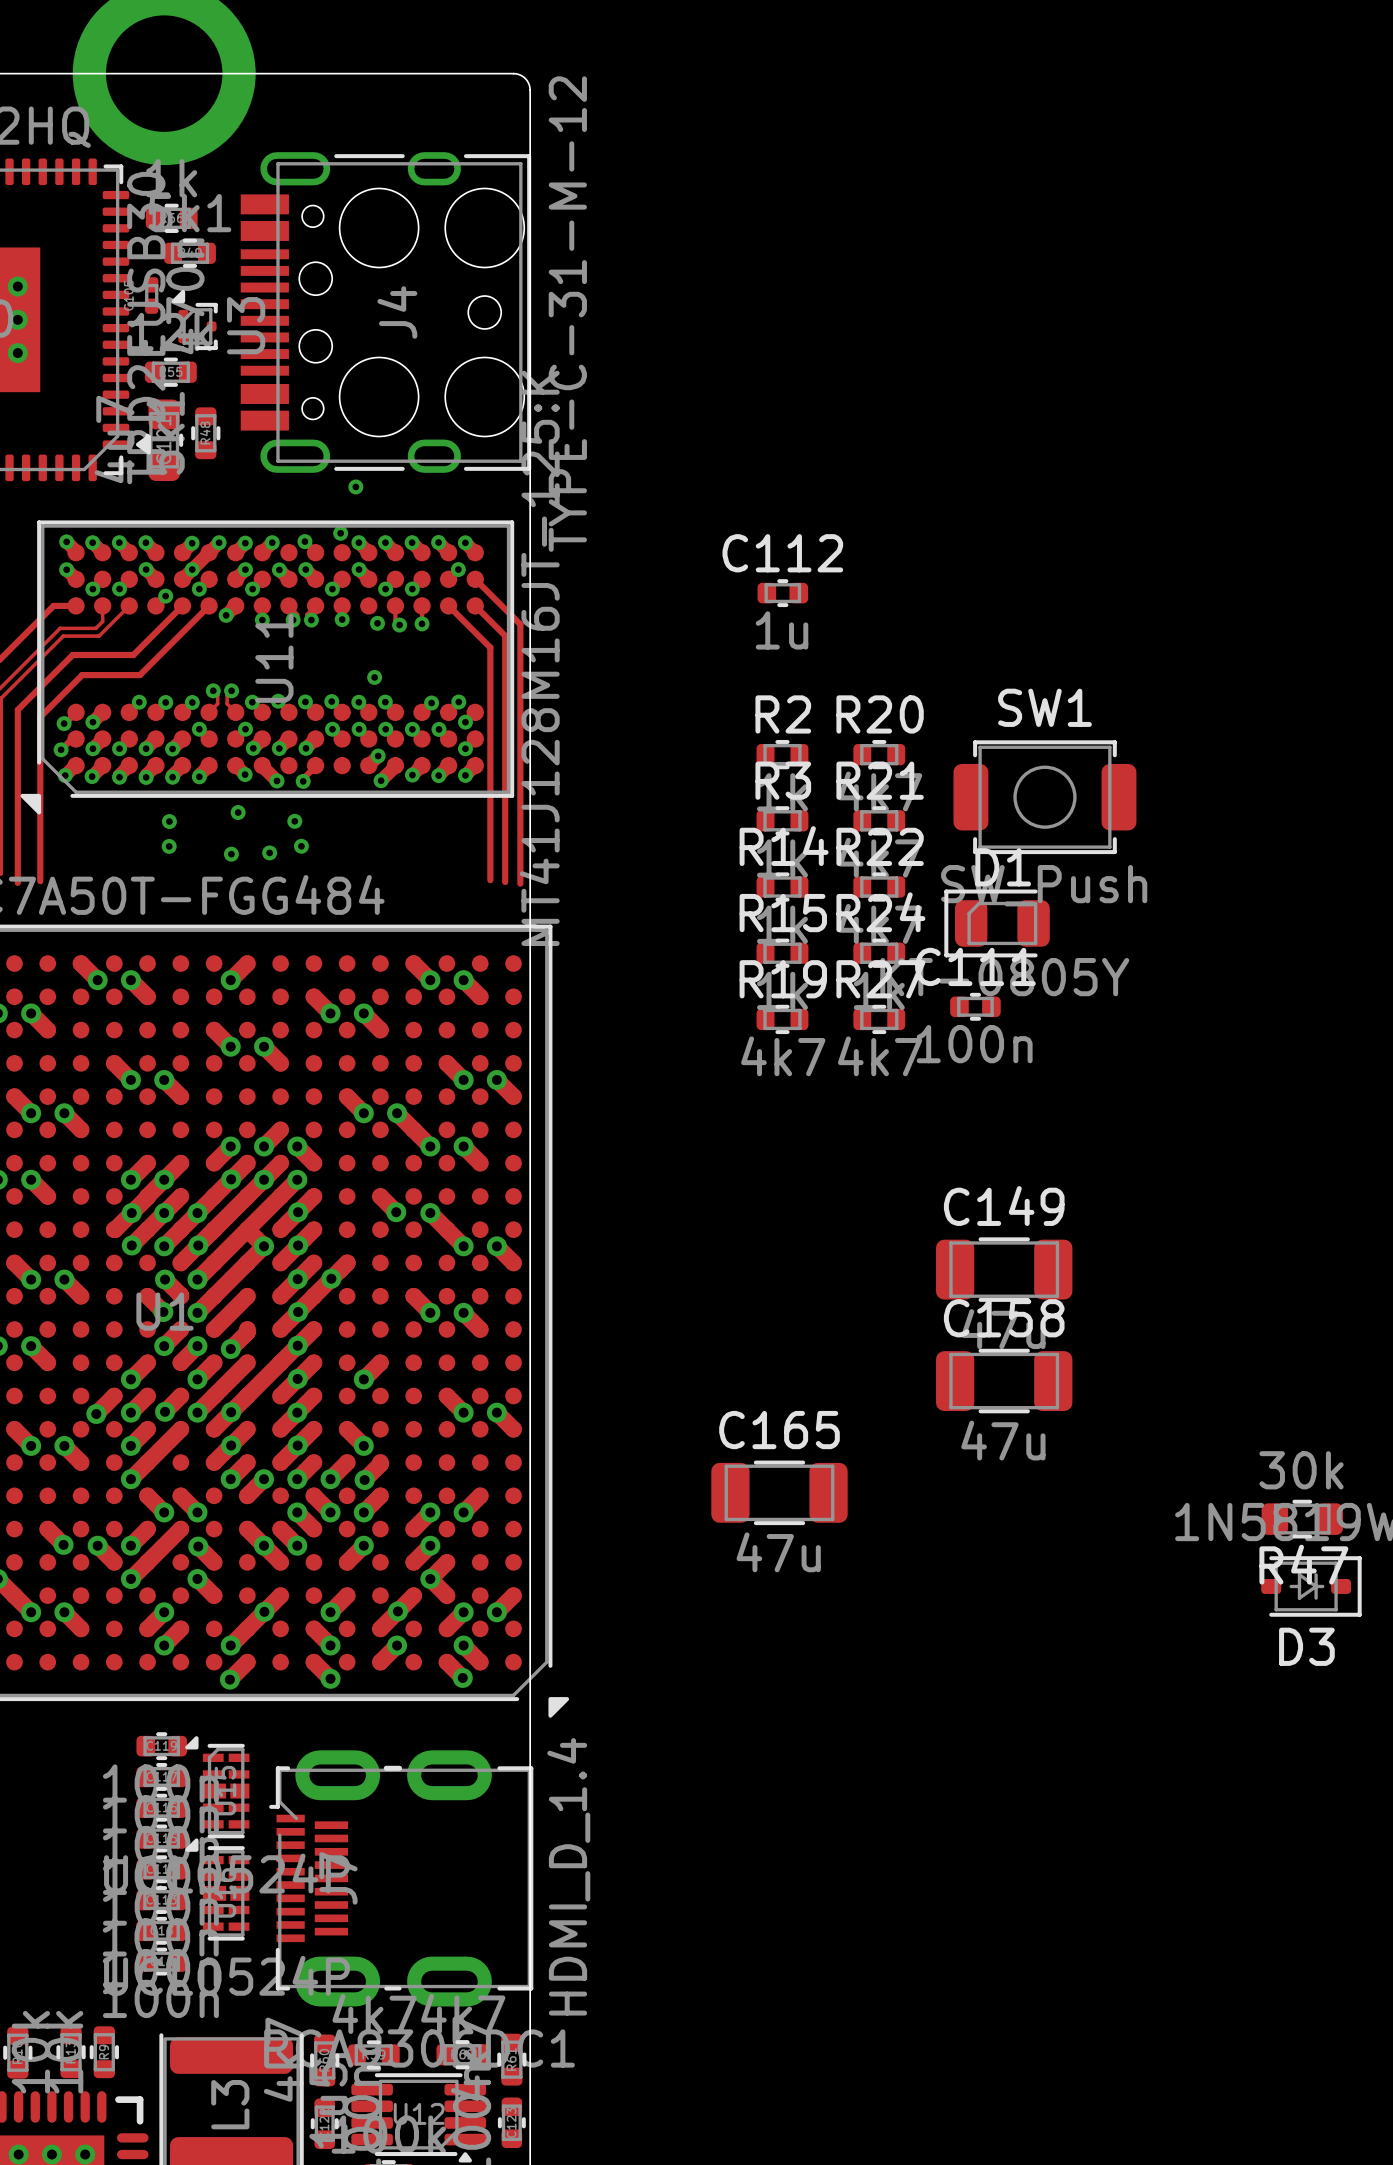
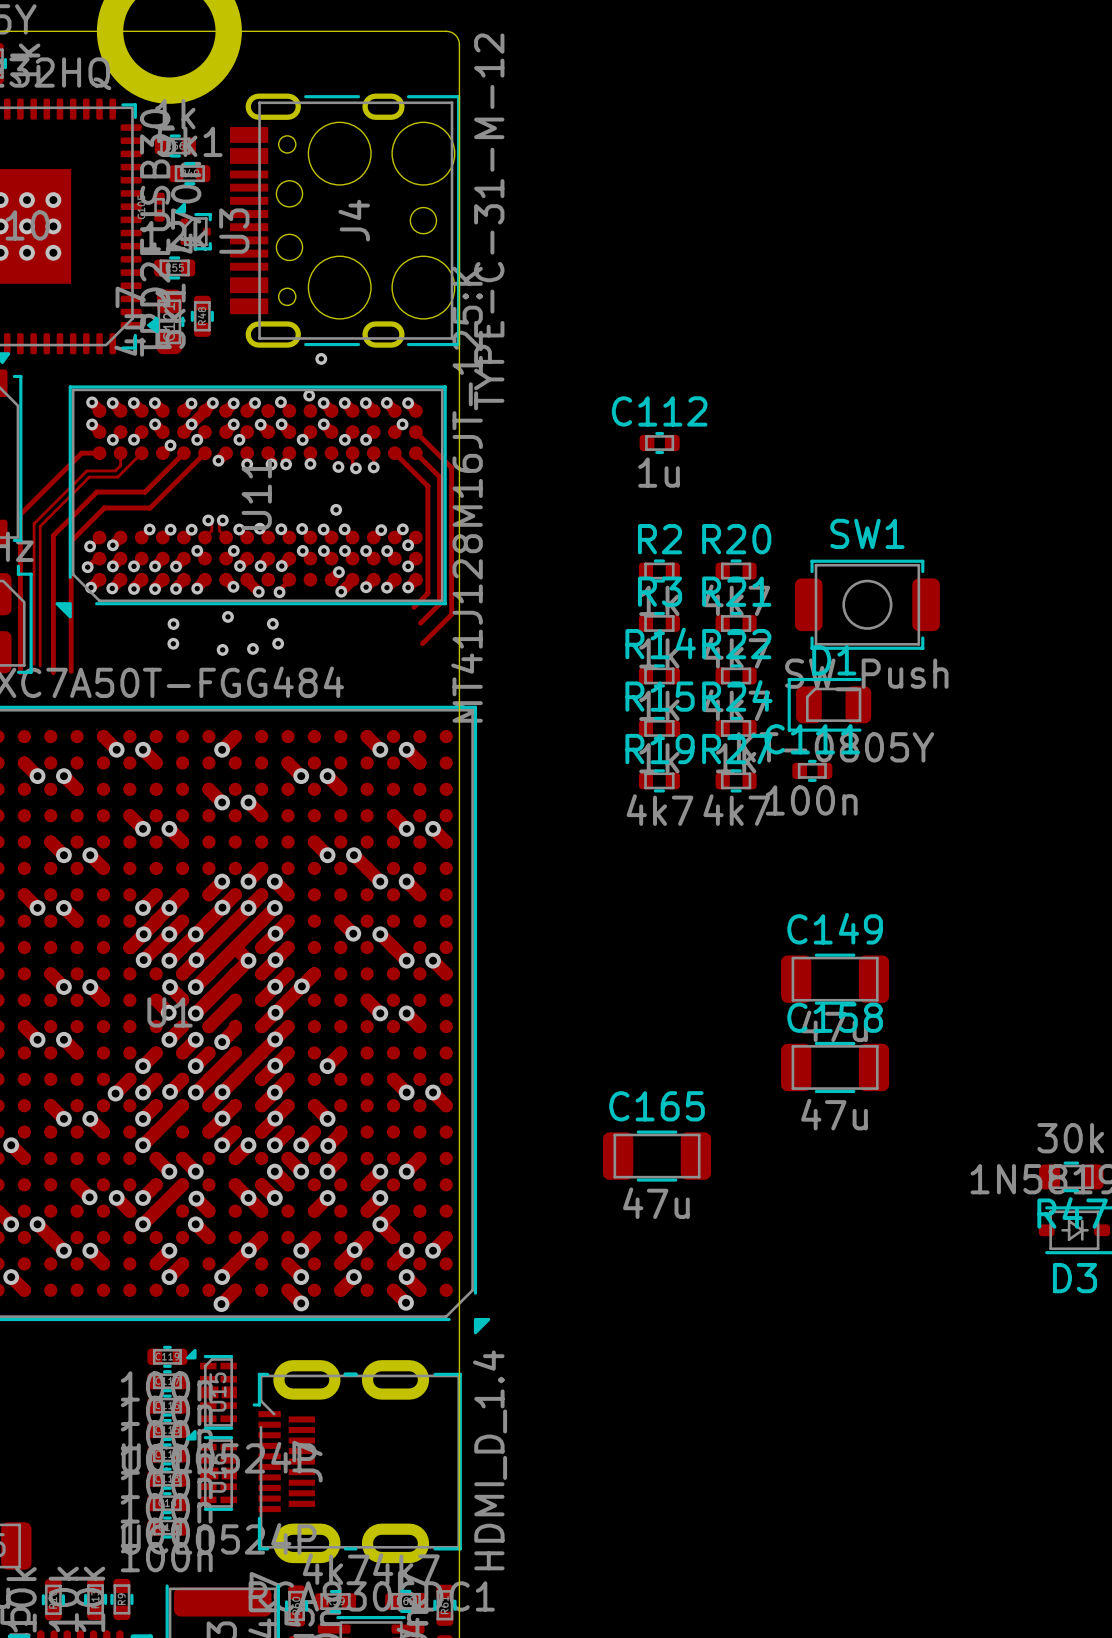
track: (490, 782) (490, 880) -> (427, 593) (413, 607)
track: (505, 796) (505, 882) -> (439, 604) (420, 623)
track: (520, 809) (520, 883) -> (451, 614) (422, 643)

